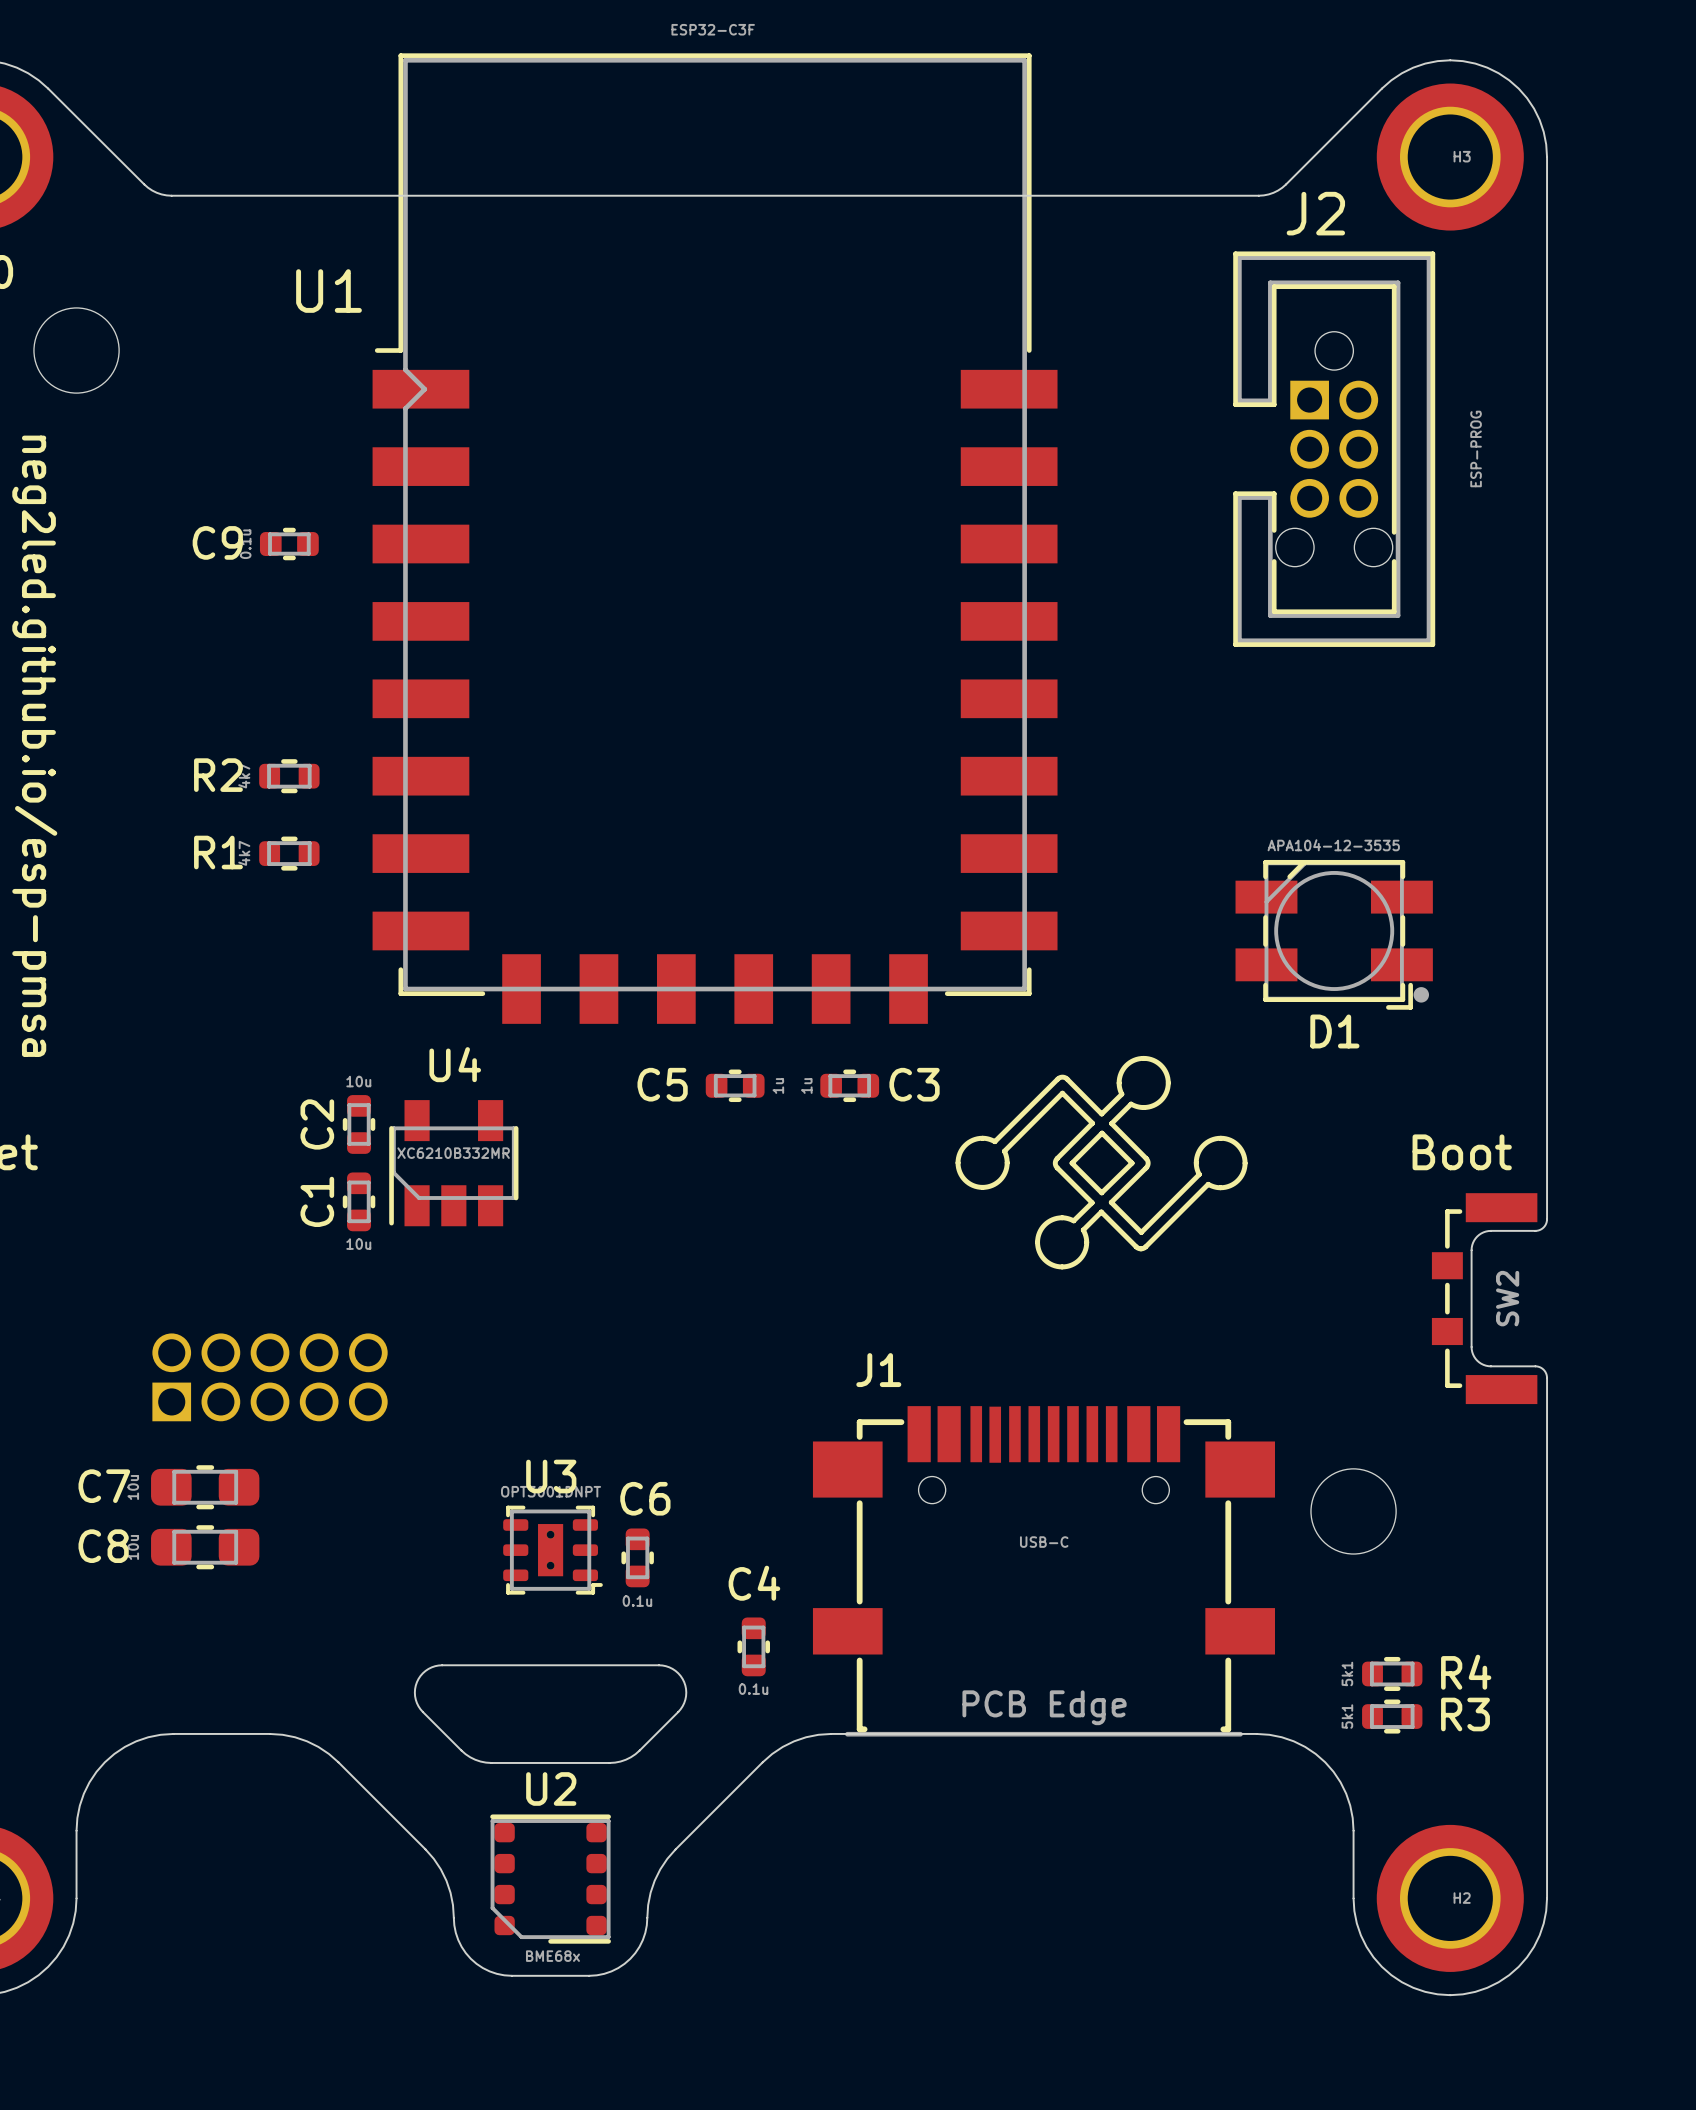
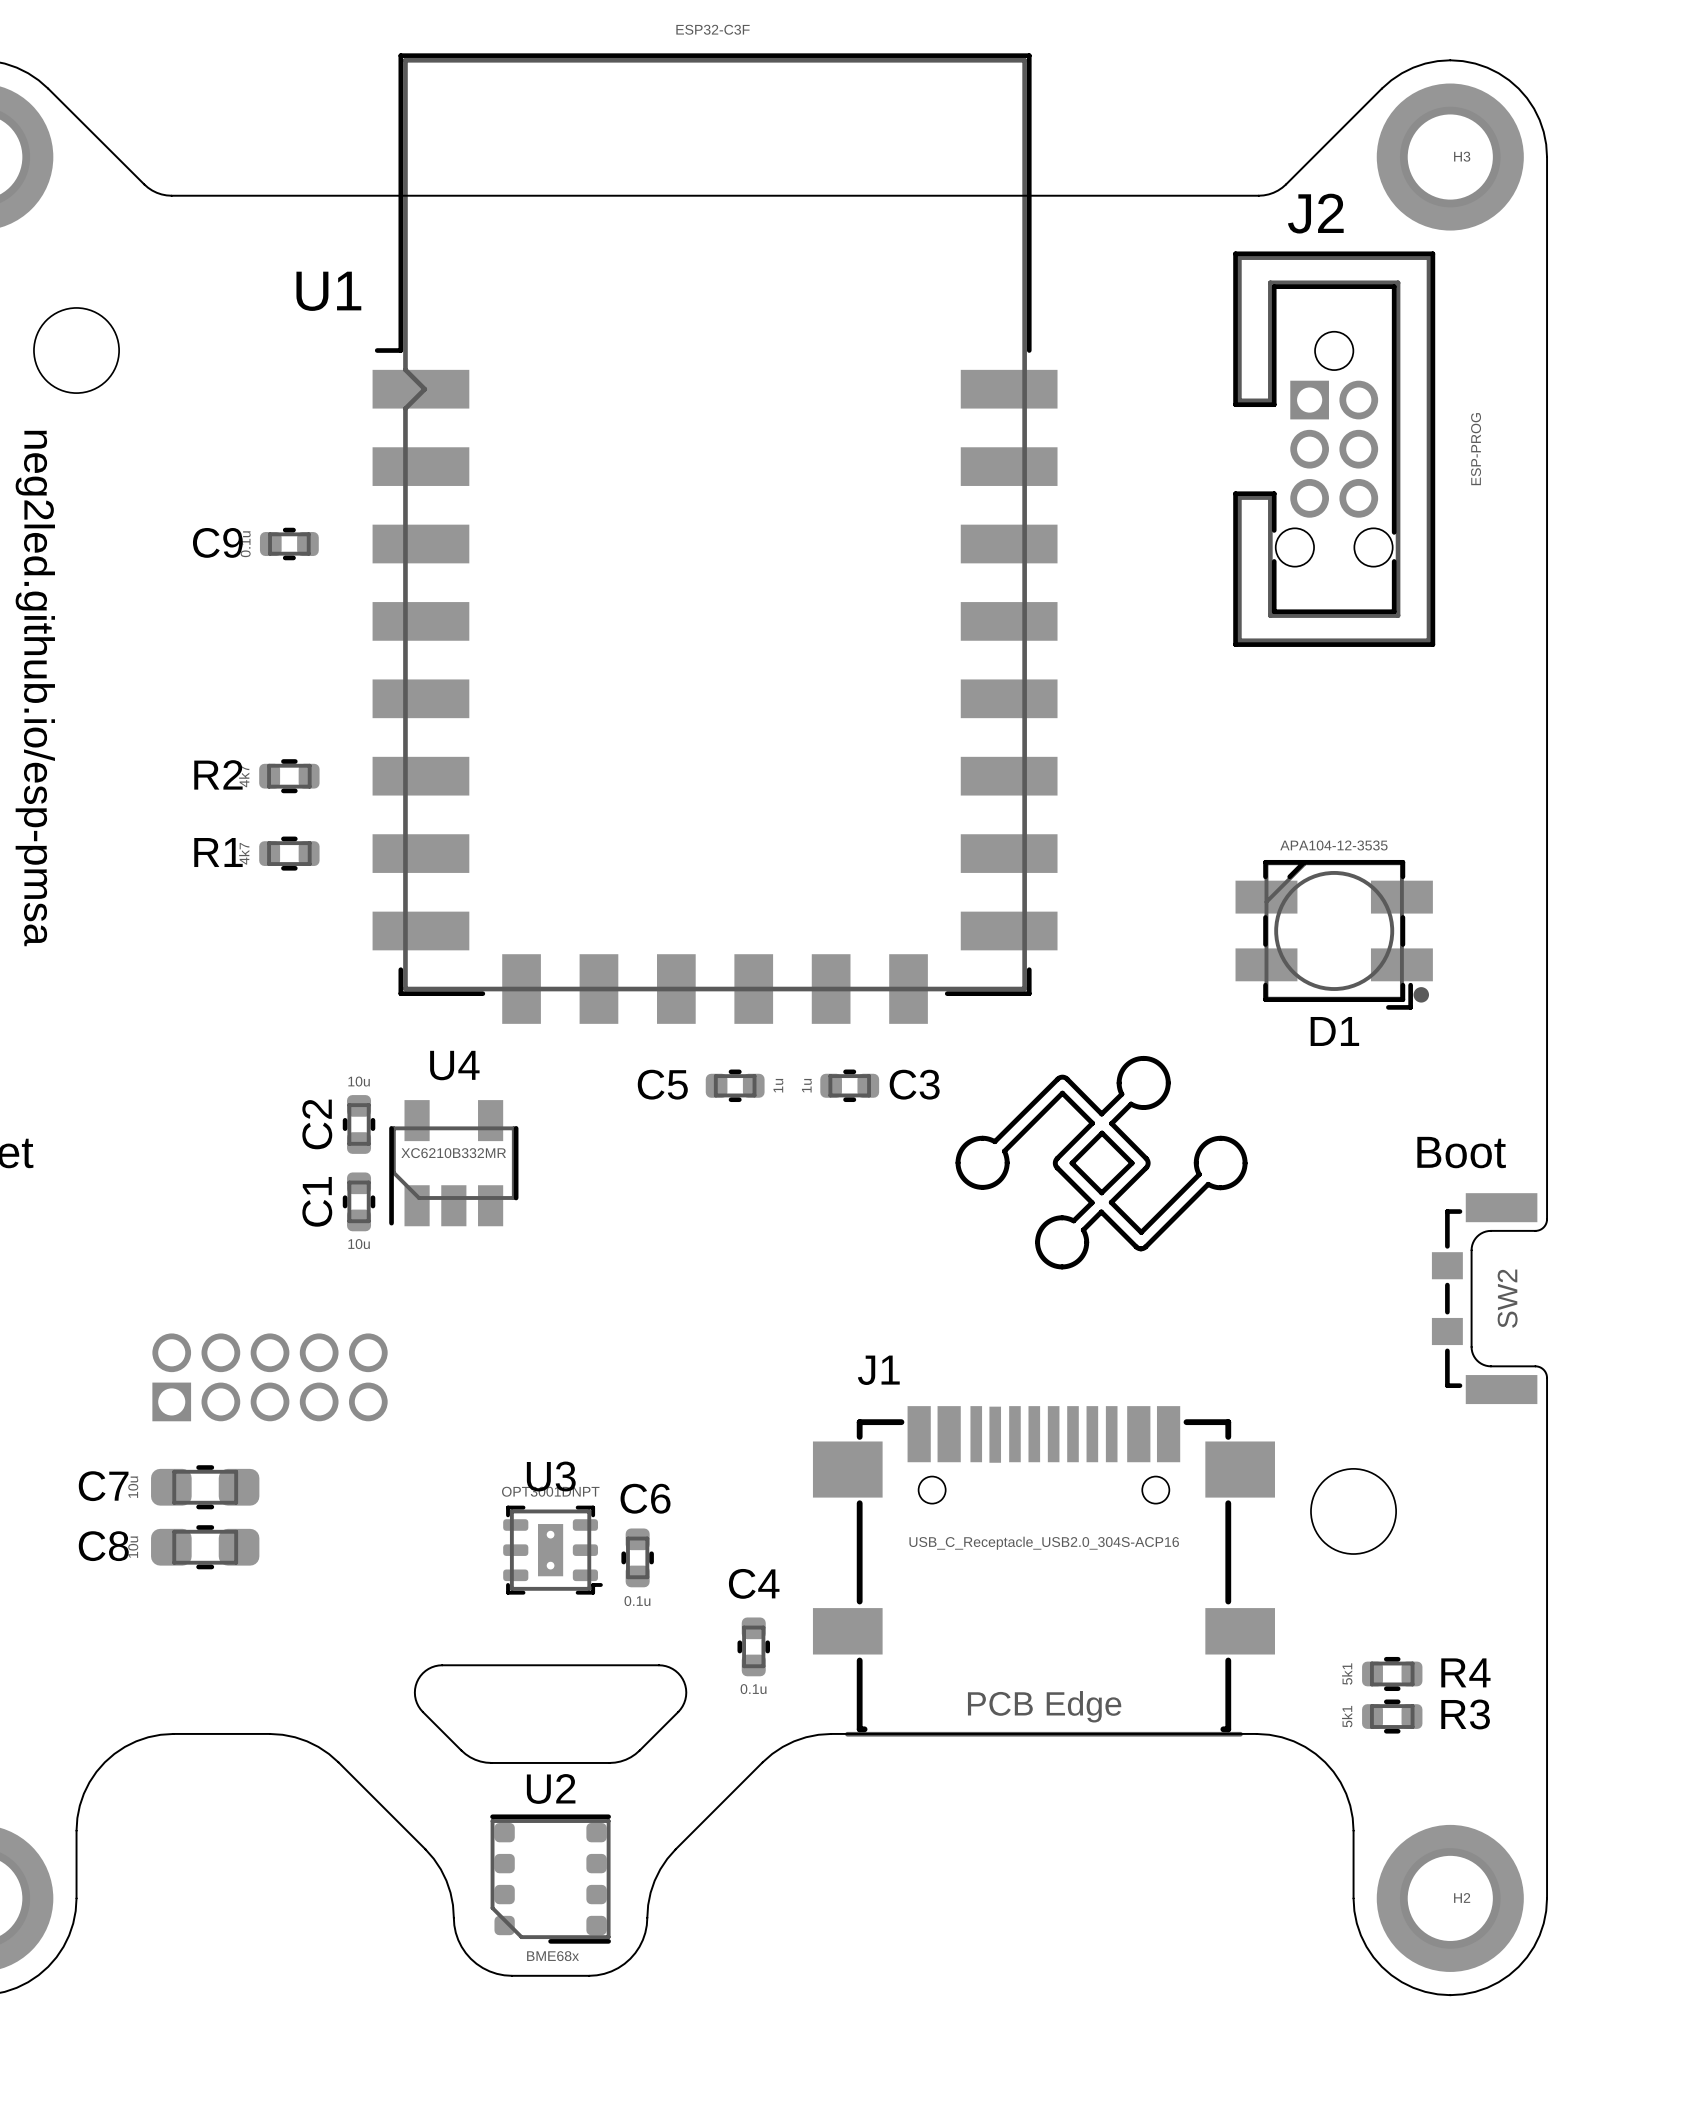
J1 value: USB-C (1044, 1542) -> USB_C_Receptacle_USB2.0_304S-ACP16 (1044, 1543)

